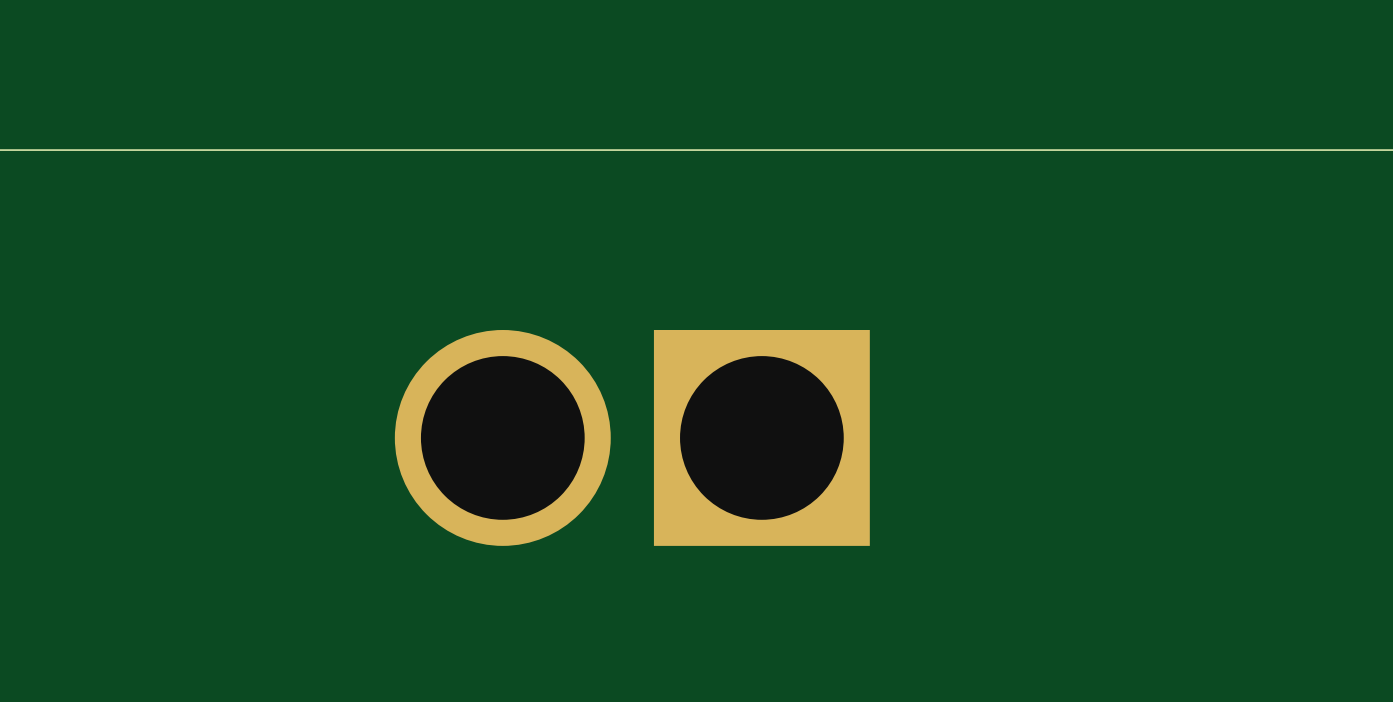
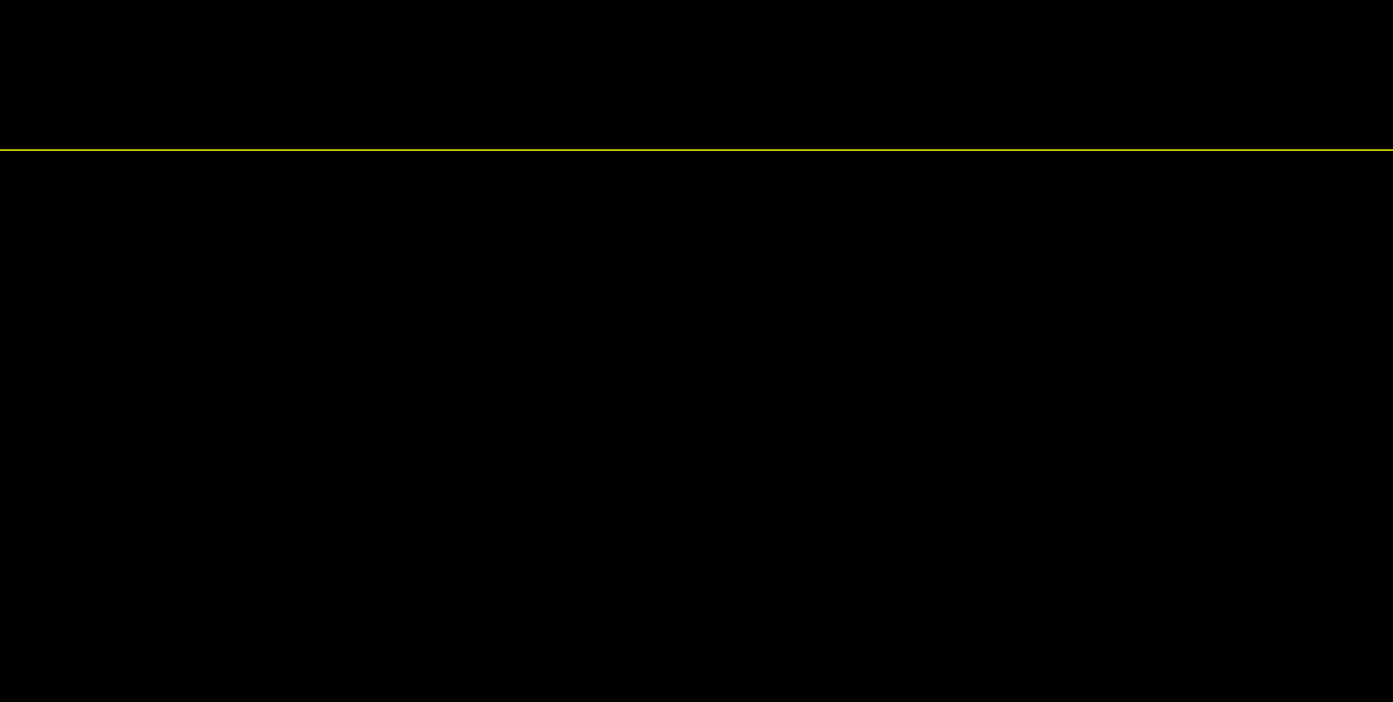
part: (632, 437) -> none

